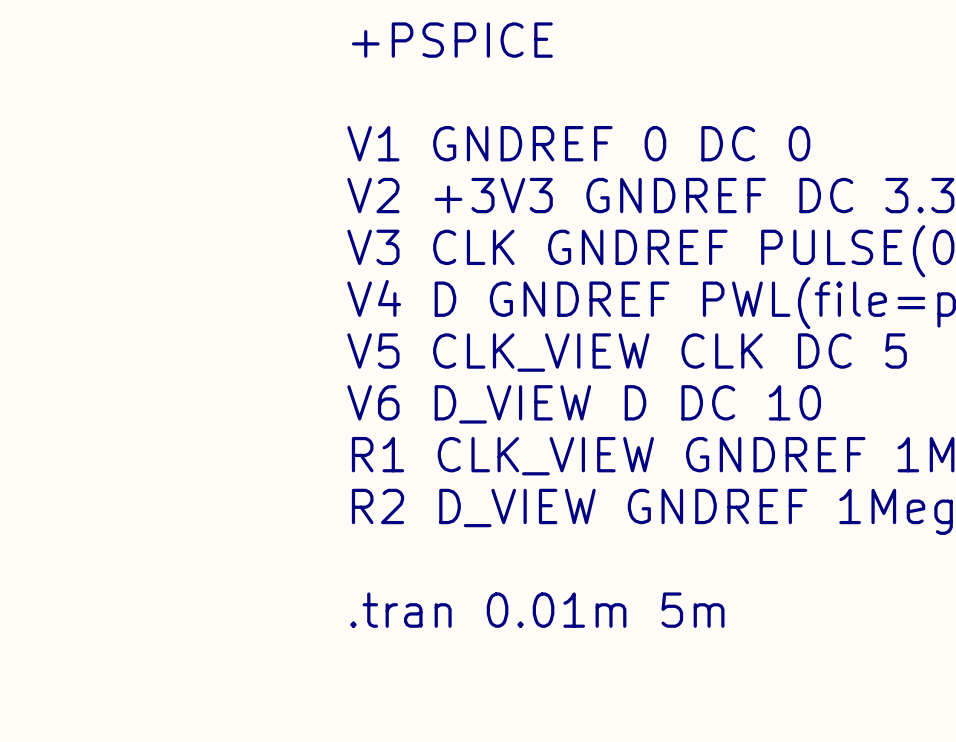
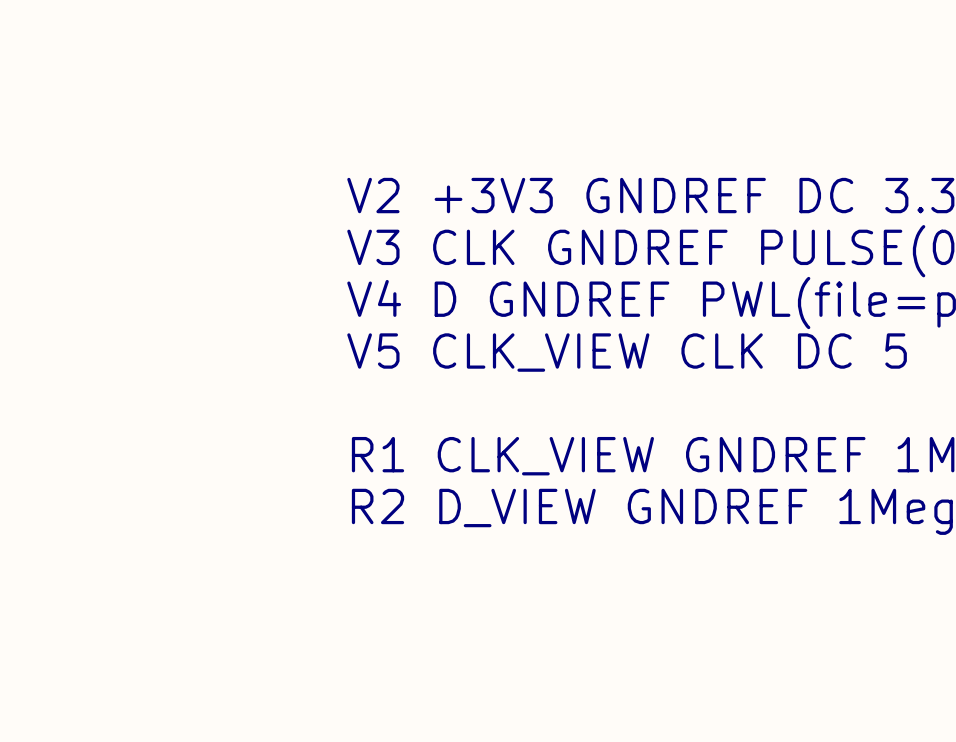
text: +PSPICE (452, 40) -> none
text: V1 GNDREF 0 DC 0 (578, 143) -> none
text: V6 D_VIEW D DC 10 (584, 404) -> none
text: .tran 0.01m 5m (537, 610) -> none

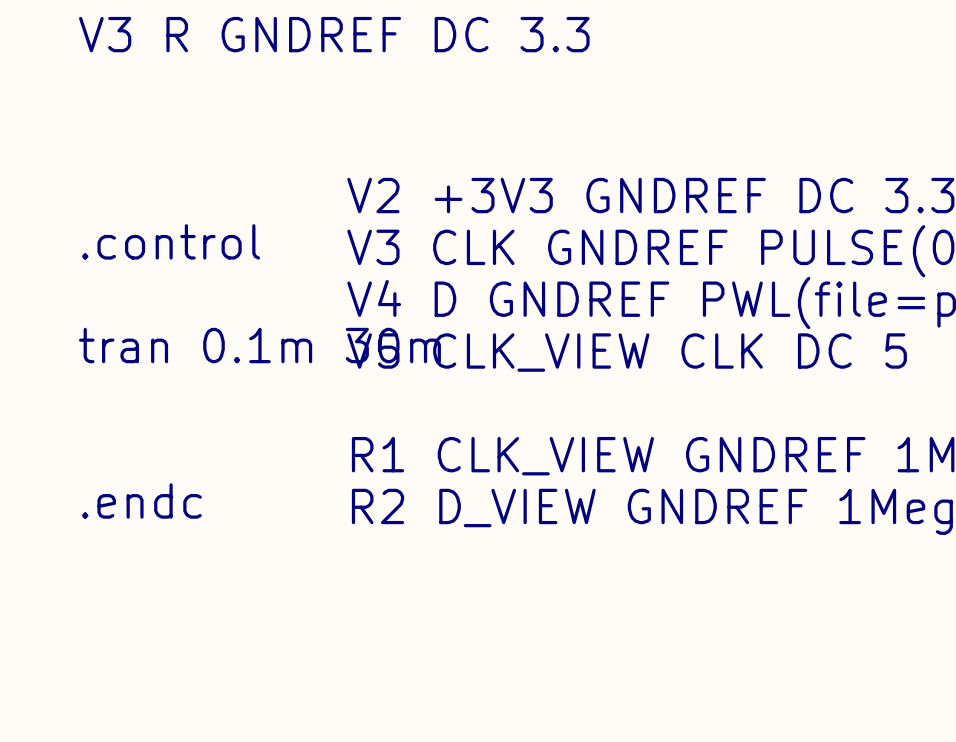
text: none -> V3 R GNDREF DC 3.3 (334, 34)
text: none -> .control (171, 241)
text: none -> tran 0.1m 30m (259, 345)
text: none -> .endc (141, 501)

